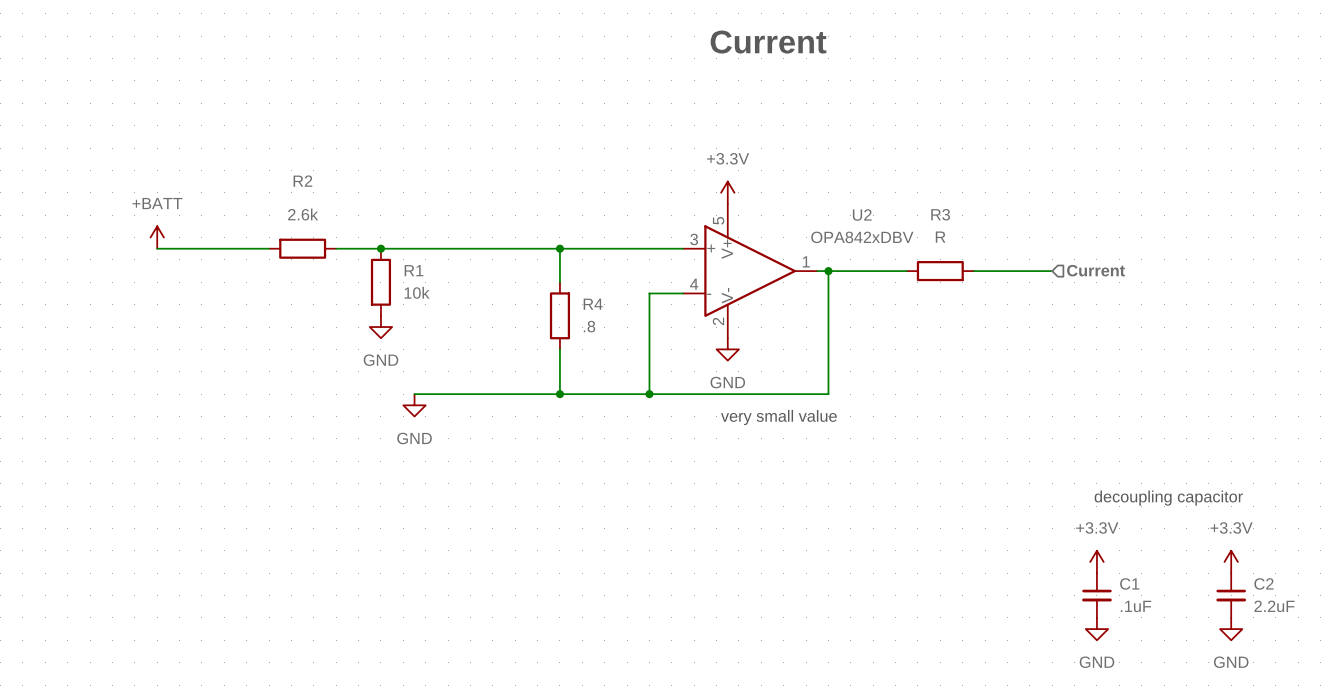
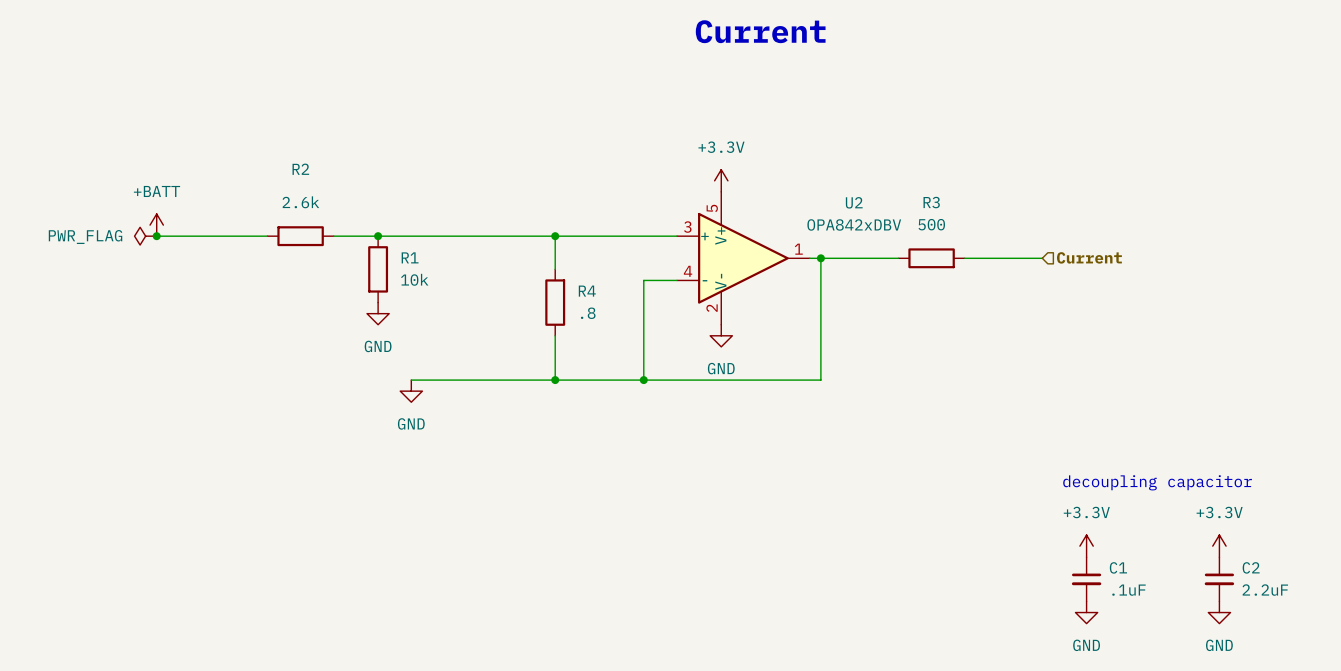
R3 value: R (940, 237) -> 500 (931, 224)
power symbol: none -> PWR_FLAG (145, 236)
junction: none -> (156, 236)
text: very small value (778, 417) -> none

